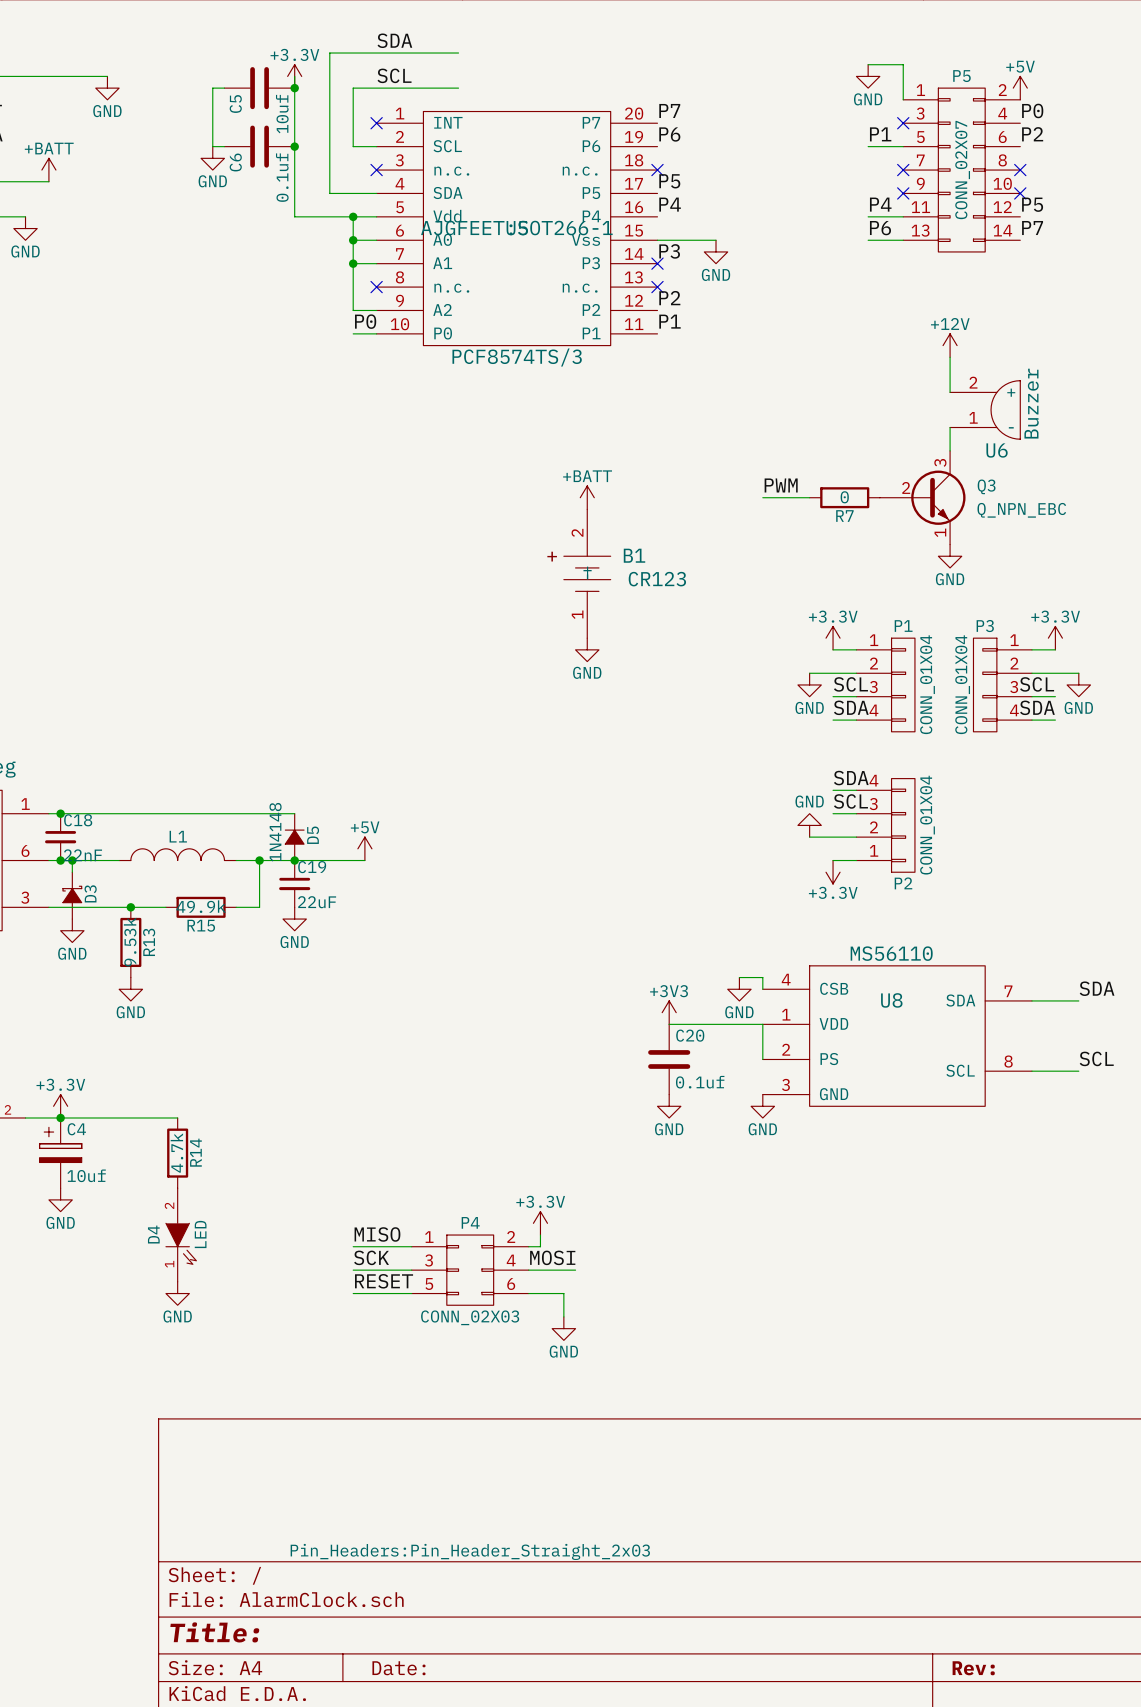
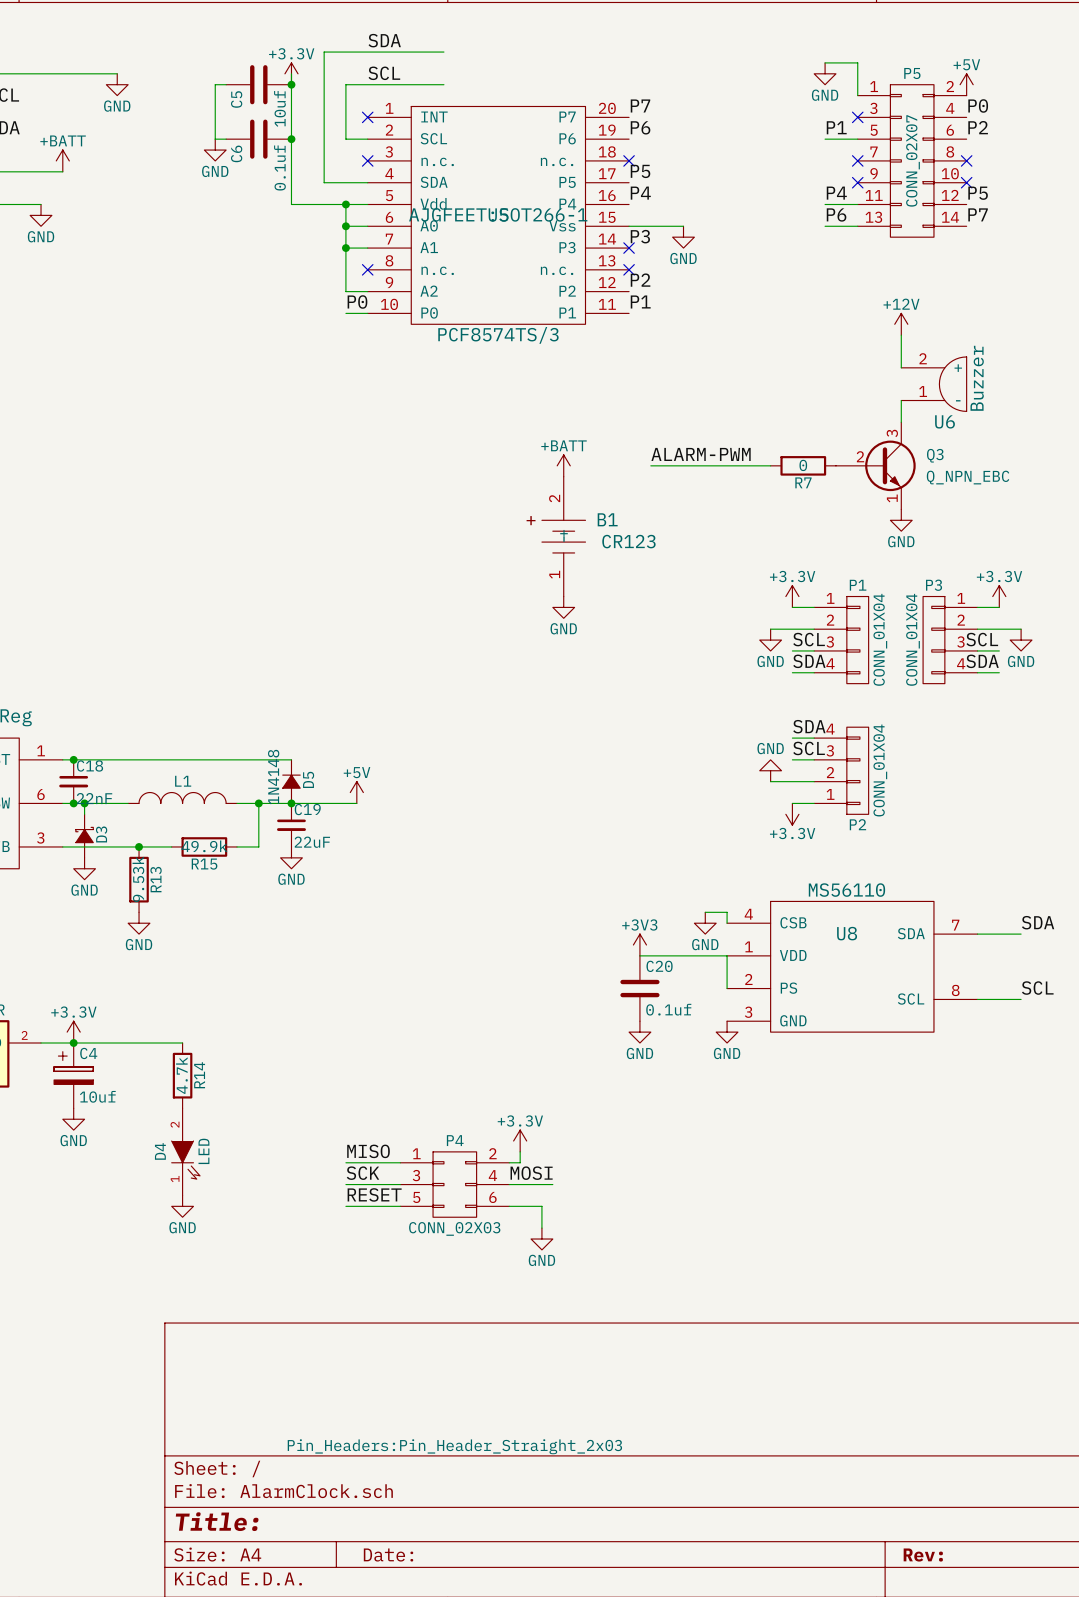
label: none -> ALARM-PWM (701, 454)
label: PWM (781, 485) -> none
wire: none -> (650, 465) (727, 465)

